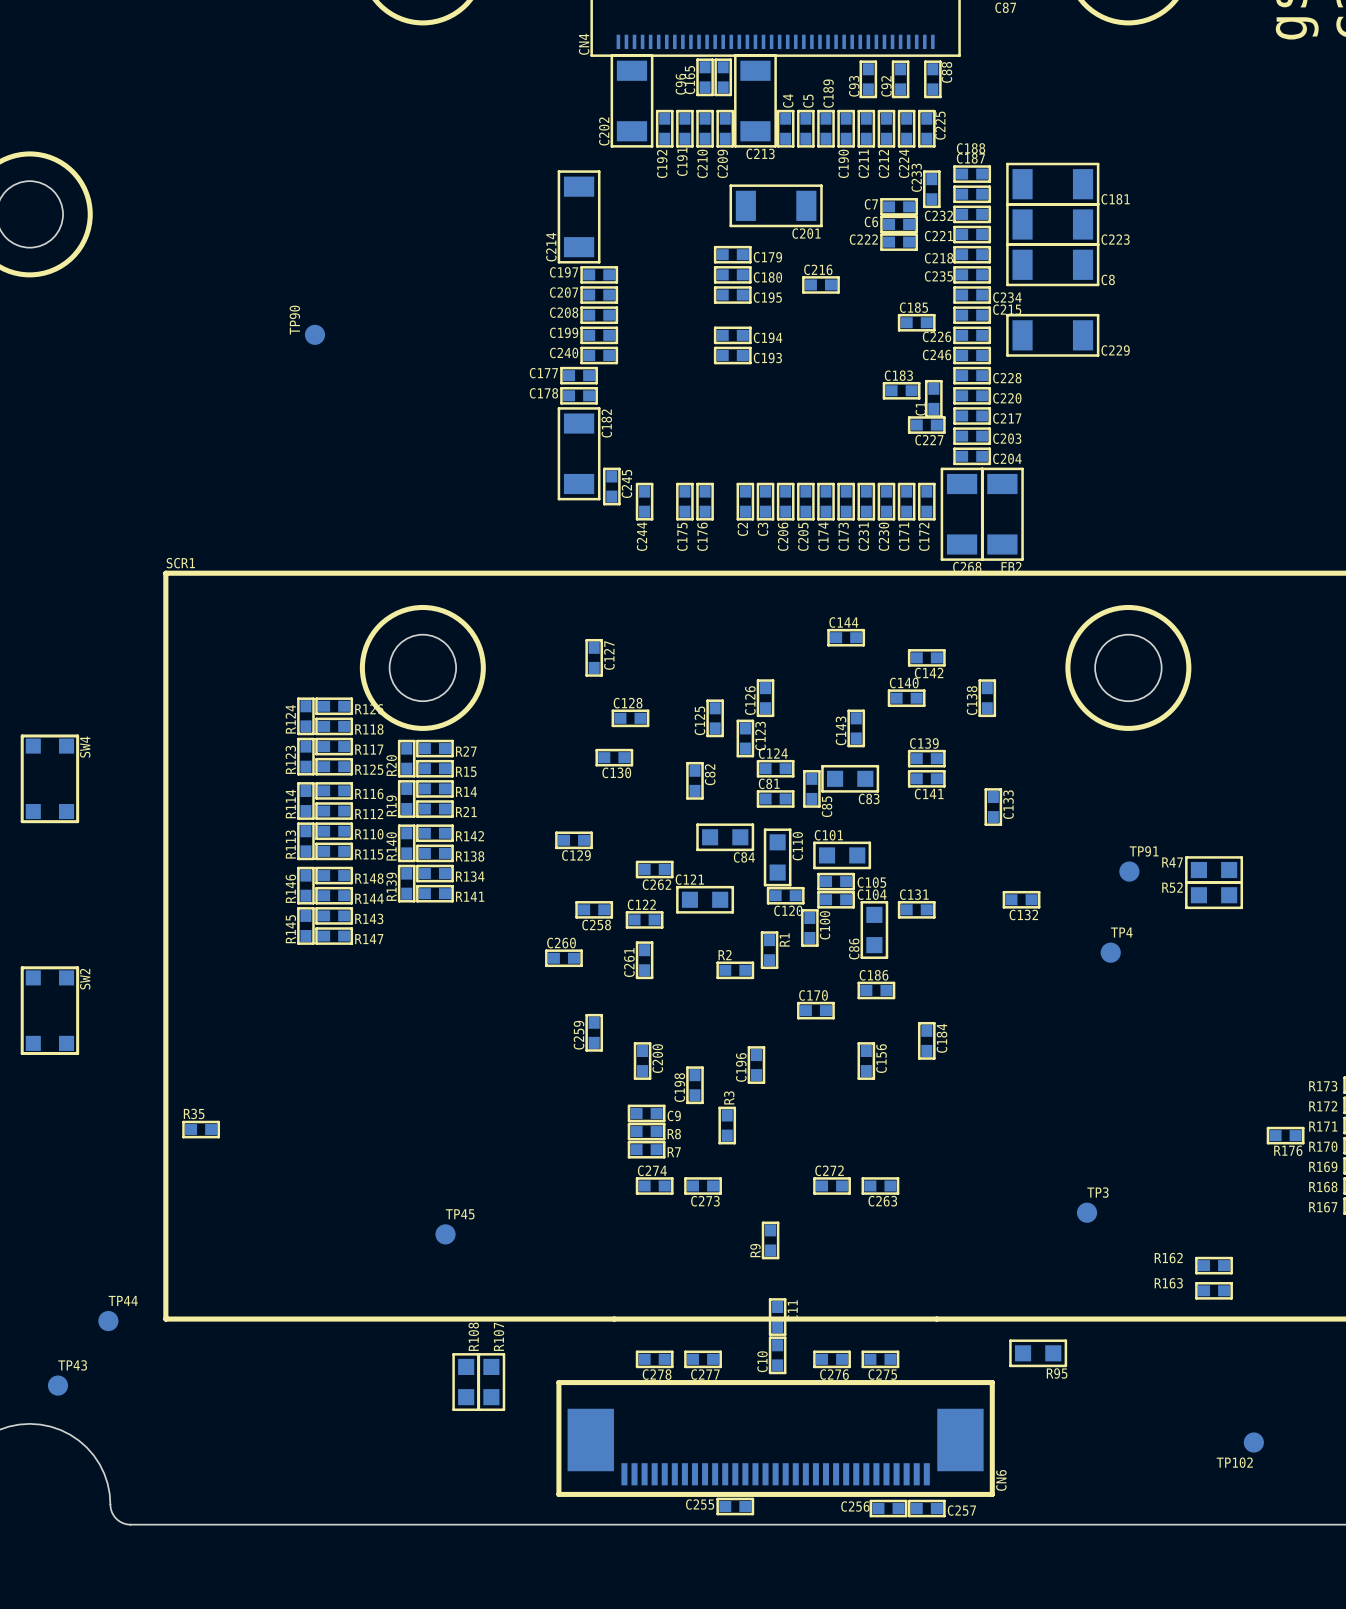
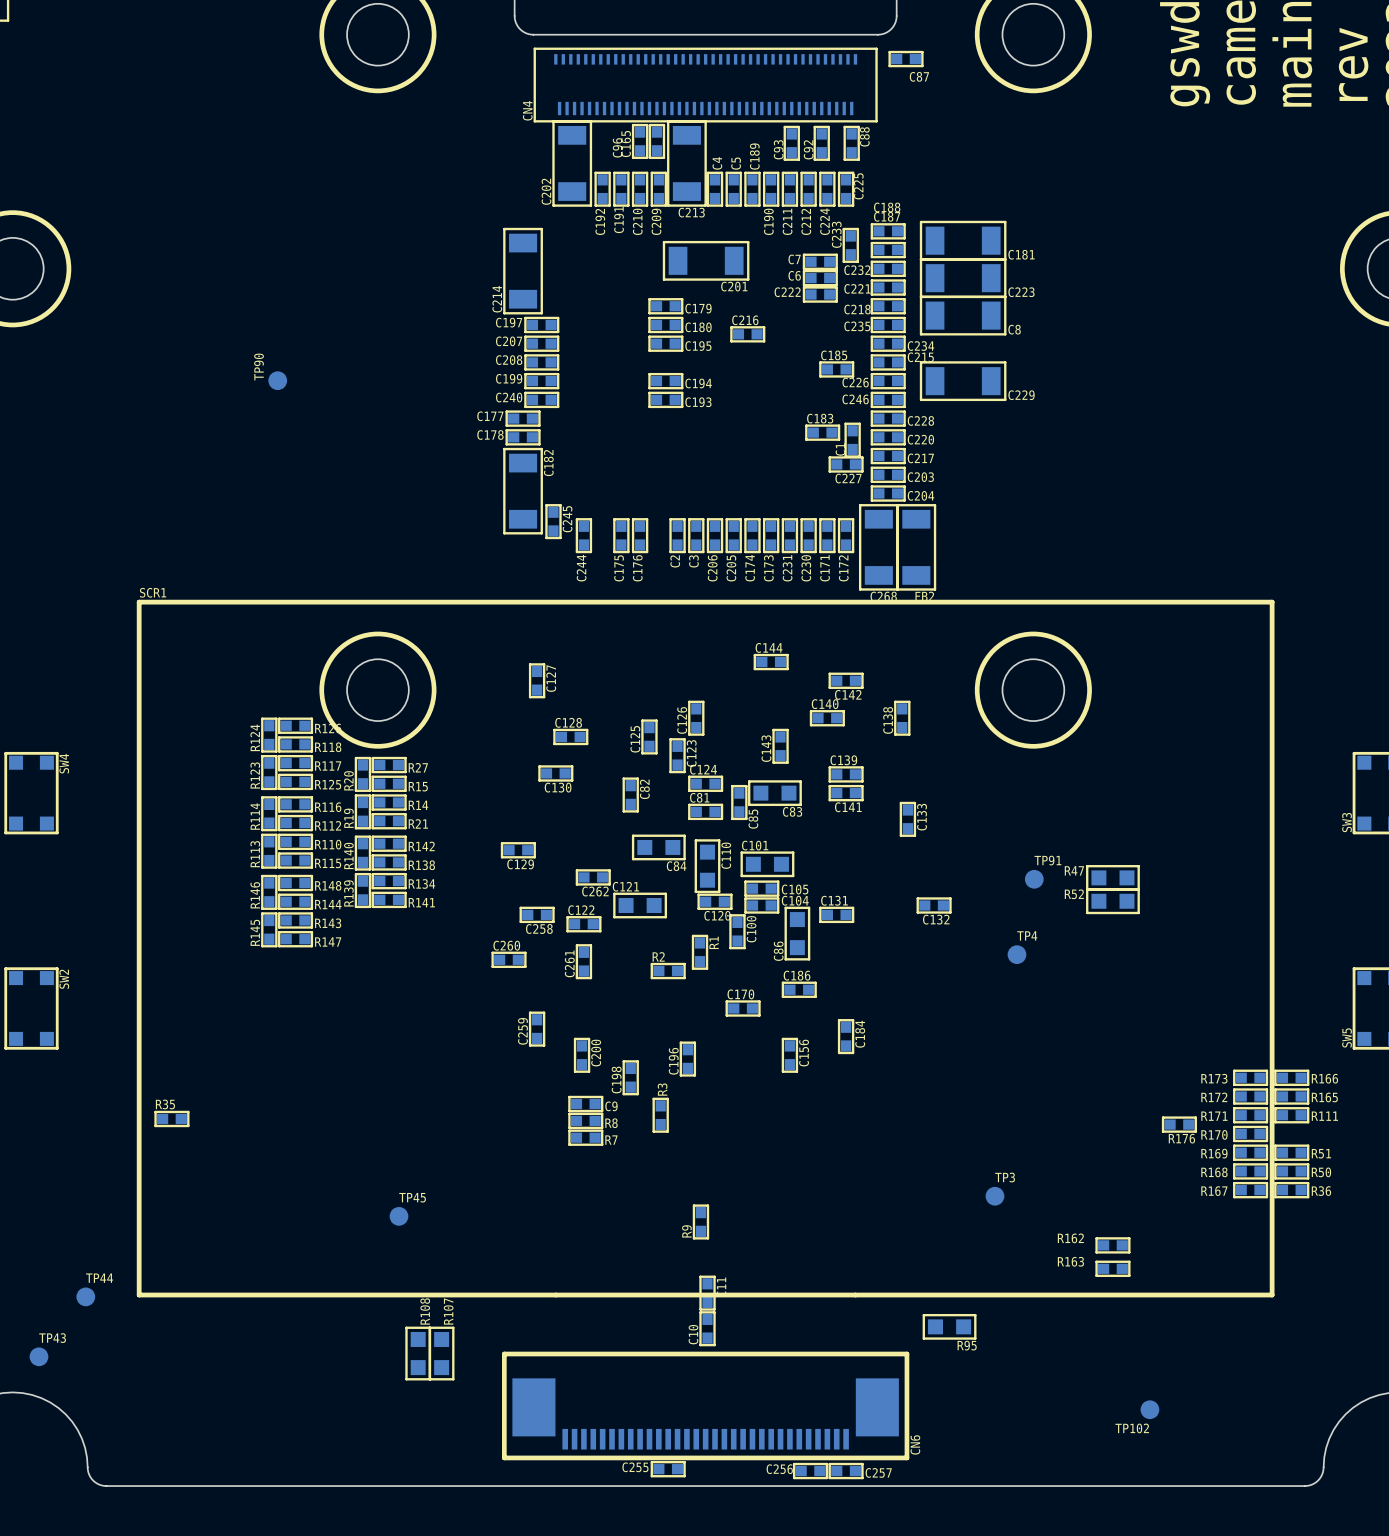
C274: (654, 1186) -> none
C273: (703, 1186) -> none
C272: (832, 1186) -> none
C263: (880, 1186) -> none
C278: (654, 1359) -> none
C277: (703, 1359) -> none
C276: (832, 1359) -> none
C275: (880, 1359) -> none

